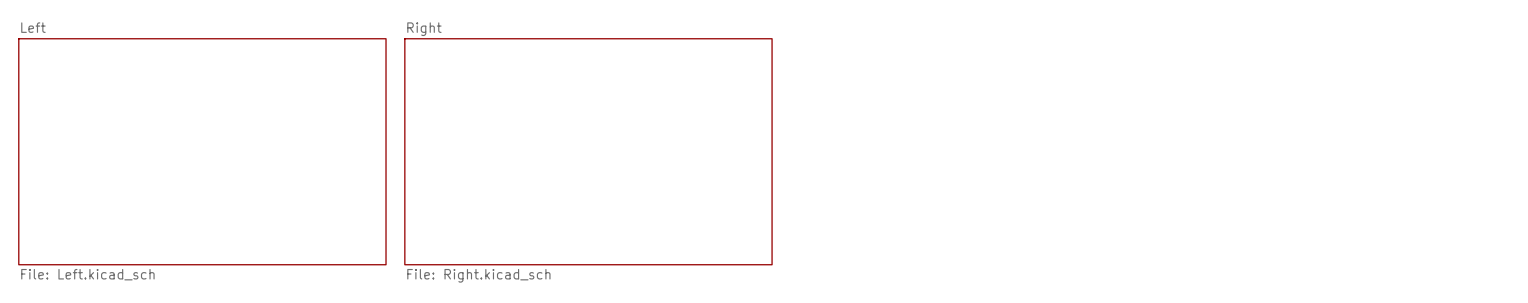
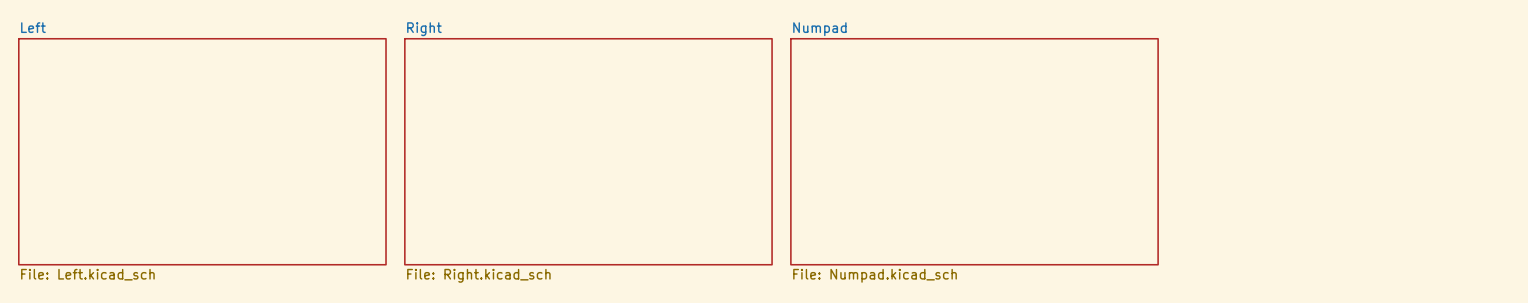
sheet Numpad: none -> File: Numpad.kicad_sch (974, 151)

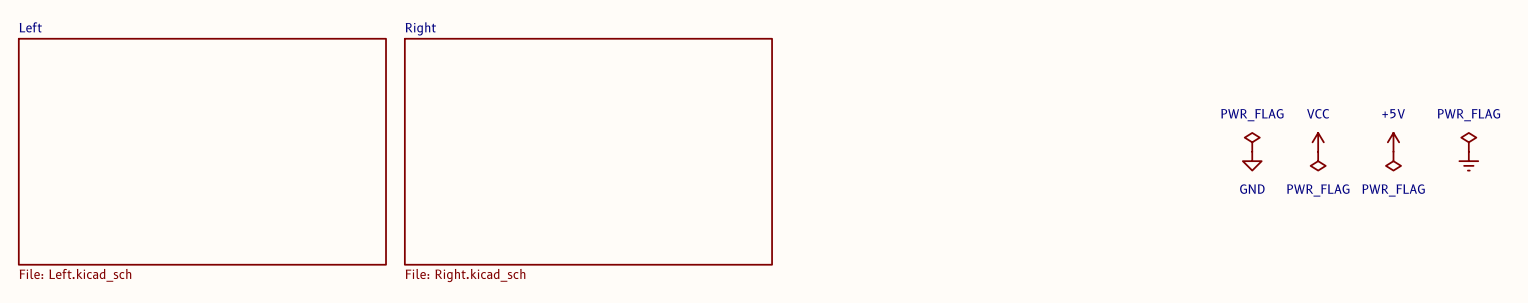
power symbol: none -> PWR_FLAG (1252, 142)
power symbol: none -> VCC (1318, 142)
power symbol: none -> +5V (1393, 142)
power symbol: none -> PWR_FLAG (1468, 142)
sheet Numpad: File: Numpad.kicad_sch (974, 151) -> none
power symbol: none -> GND (1252, 161)
power symbol: none -> PWR_FLAG (1318, 161)
power symbol: none -> PWR_FLAG (1393, 161)
power symbol: none -> (1468, 161)

